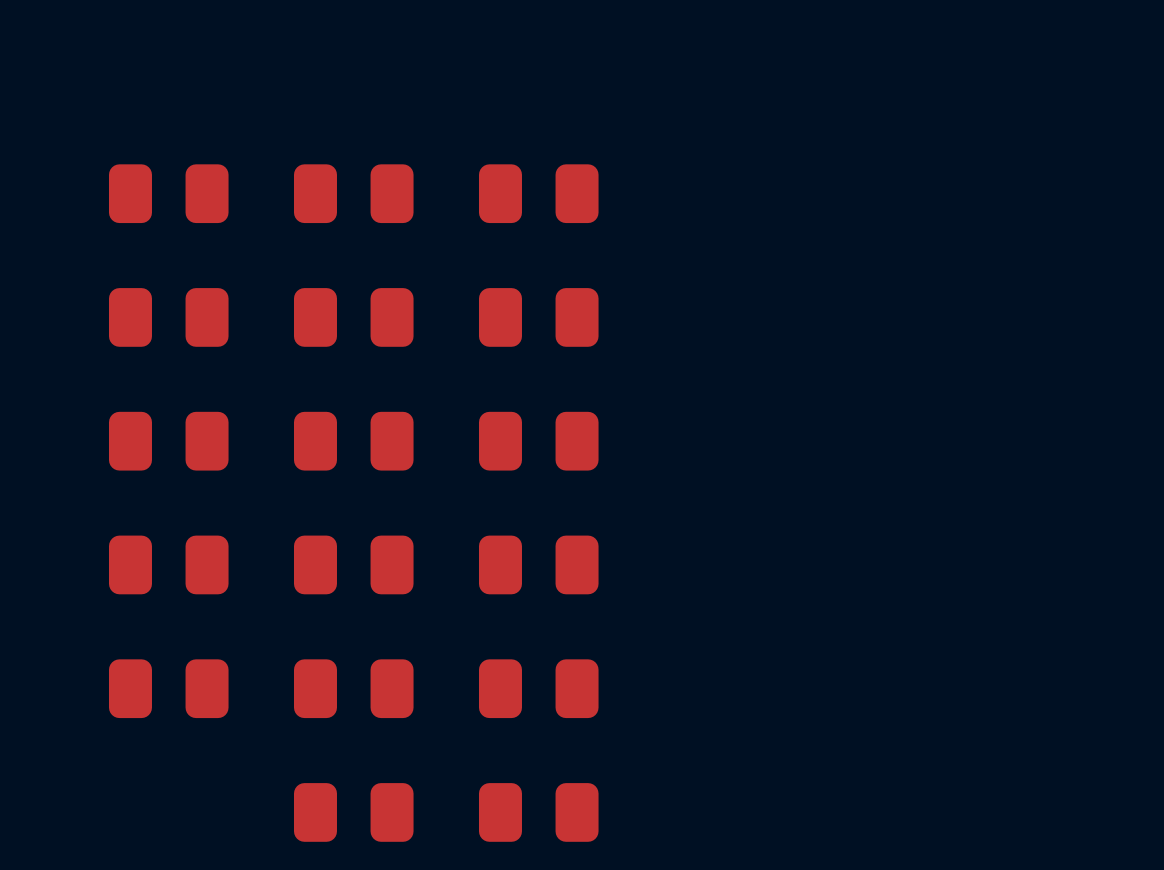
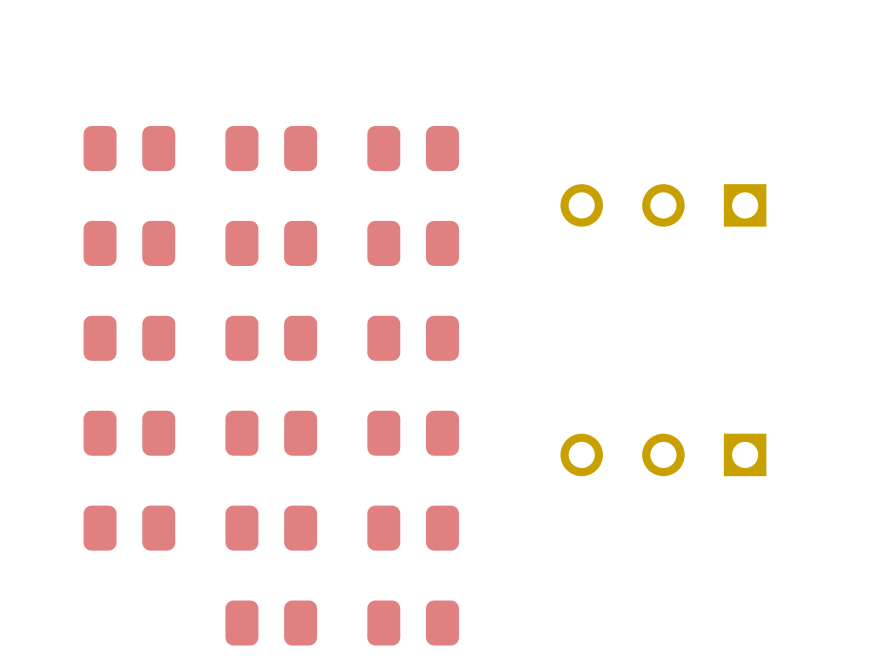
part: none -> (663, 205)
part: none -> (663, 454)

